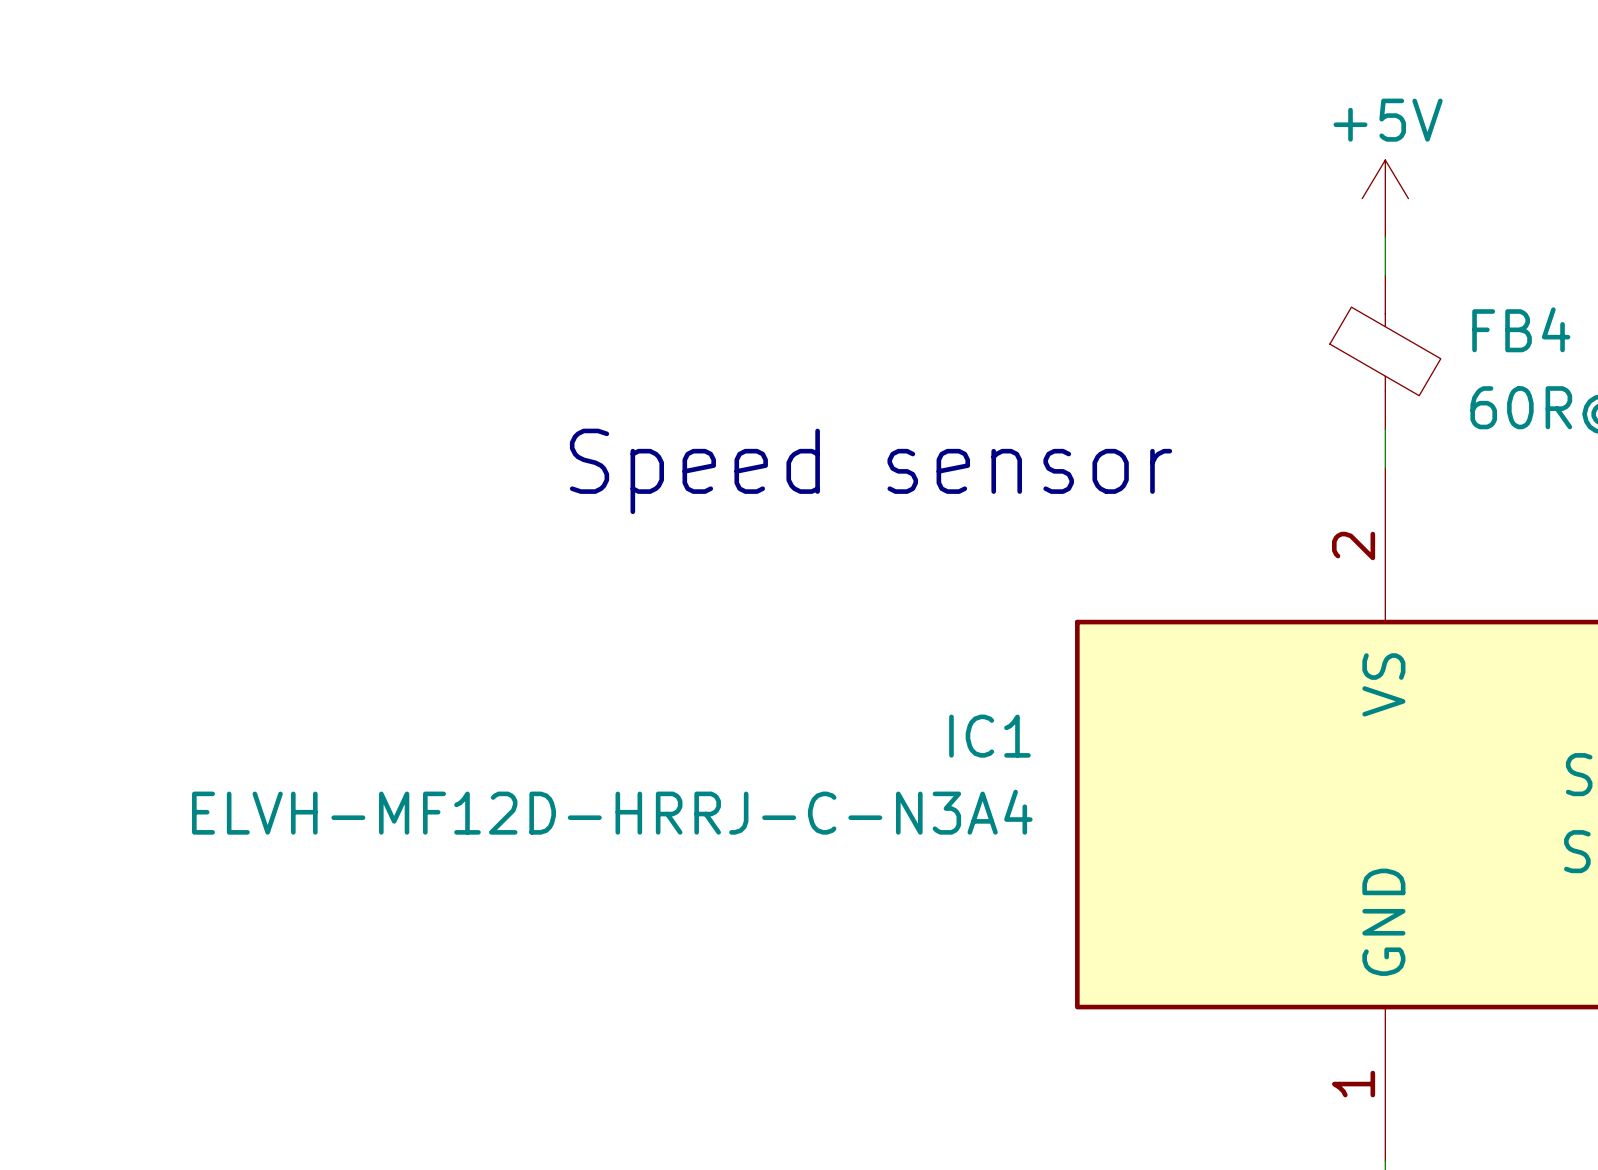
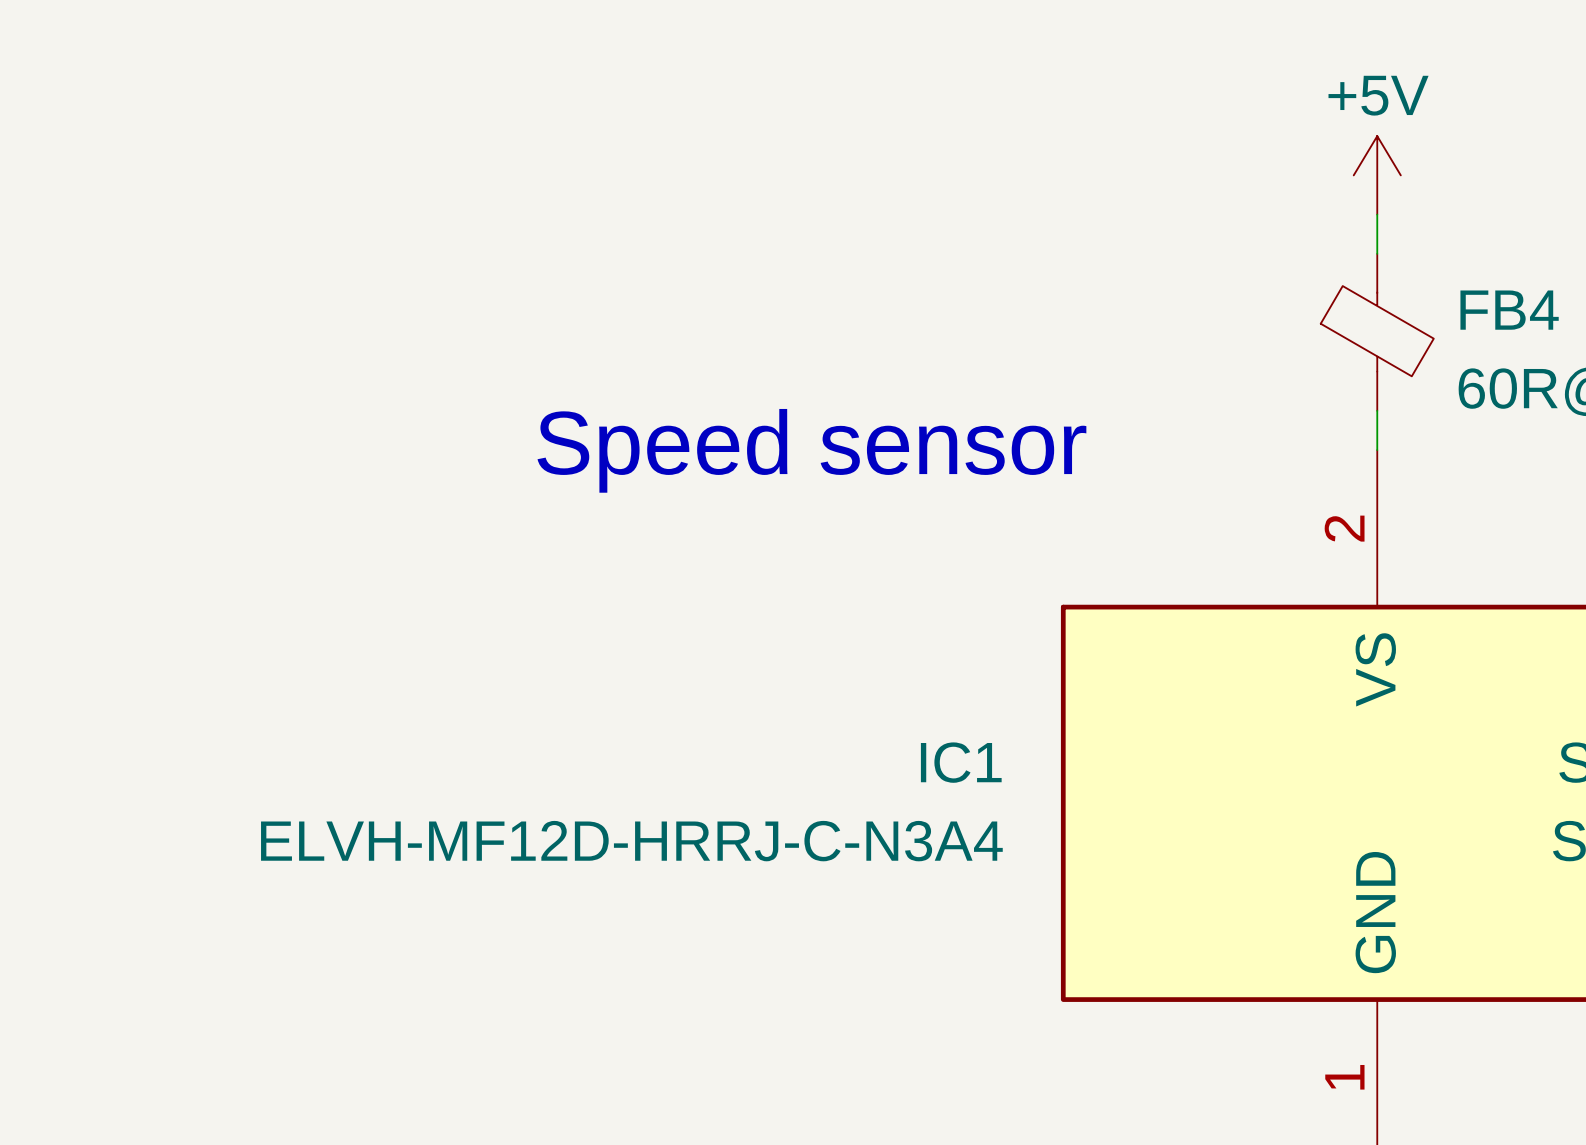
IC1 name position: IC1 (989, 736) -> IC1 (961, 762)
IC1 value position: ELVH-MF12D-HRRJ-C-N3A4 (612, 812) -> ELVH-MF12D-HRRJ-C-N3A4 (631, 841)

